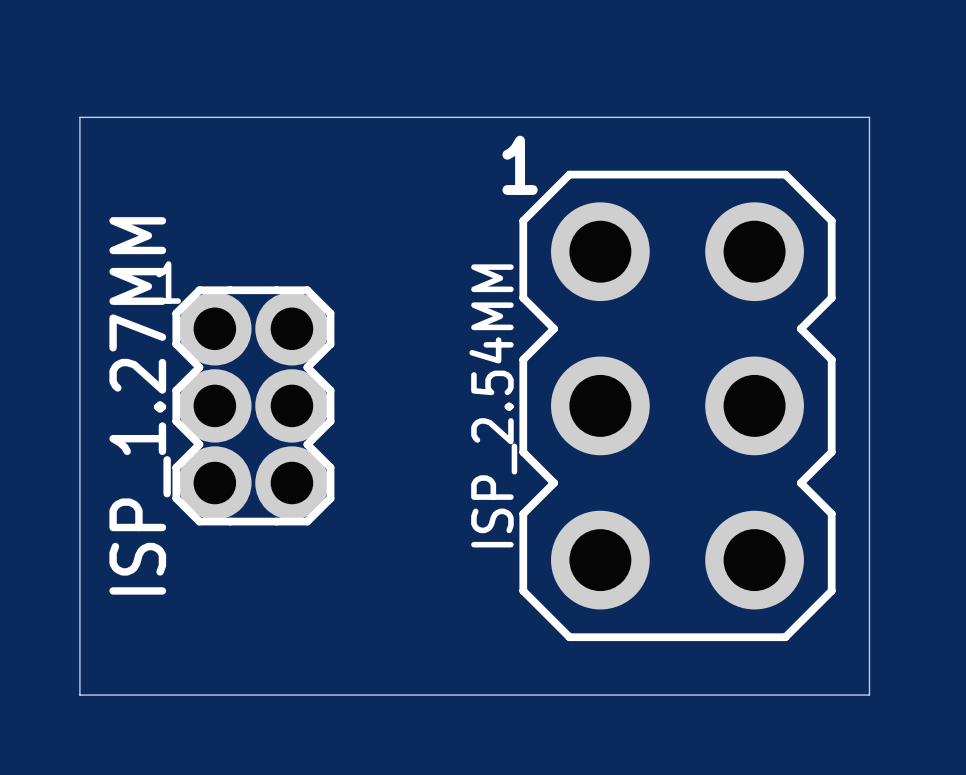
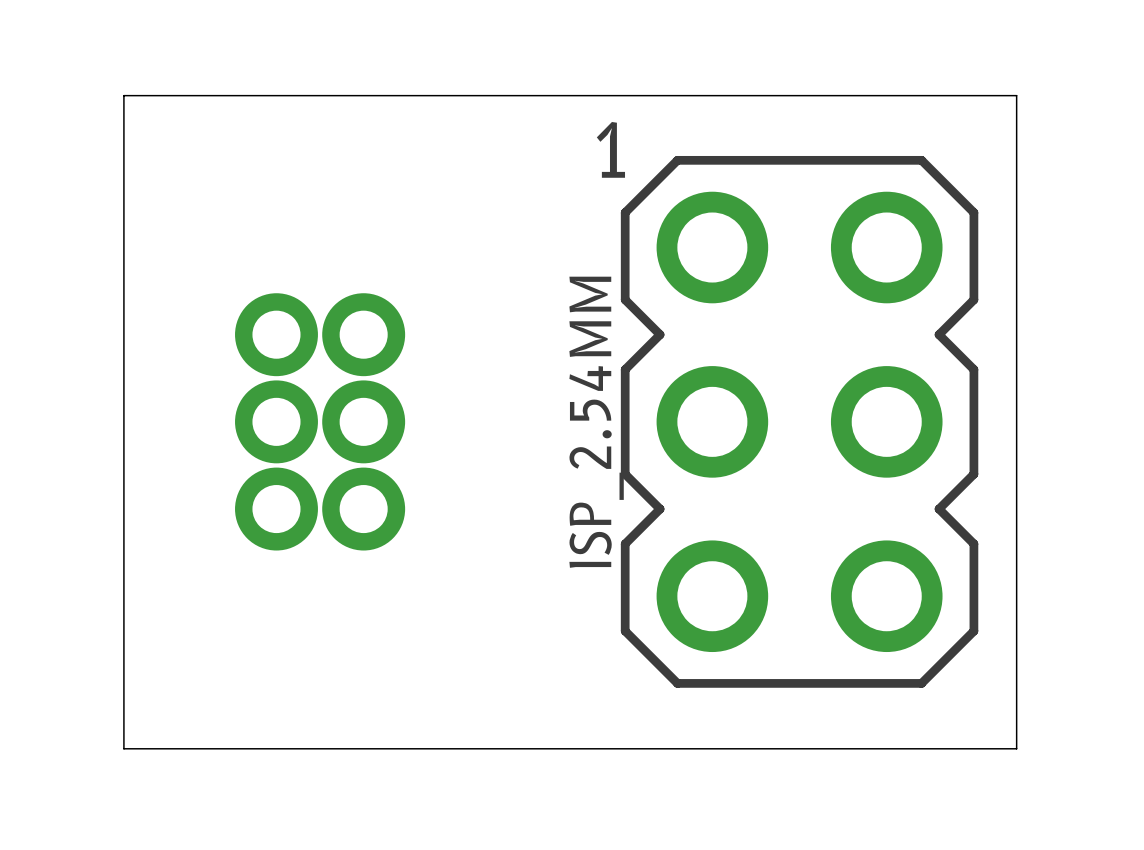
ISP_1.27MM side: top (253, 405) -> bottom (320, 421)

